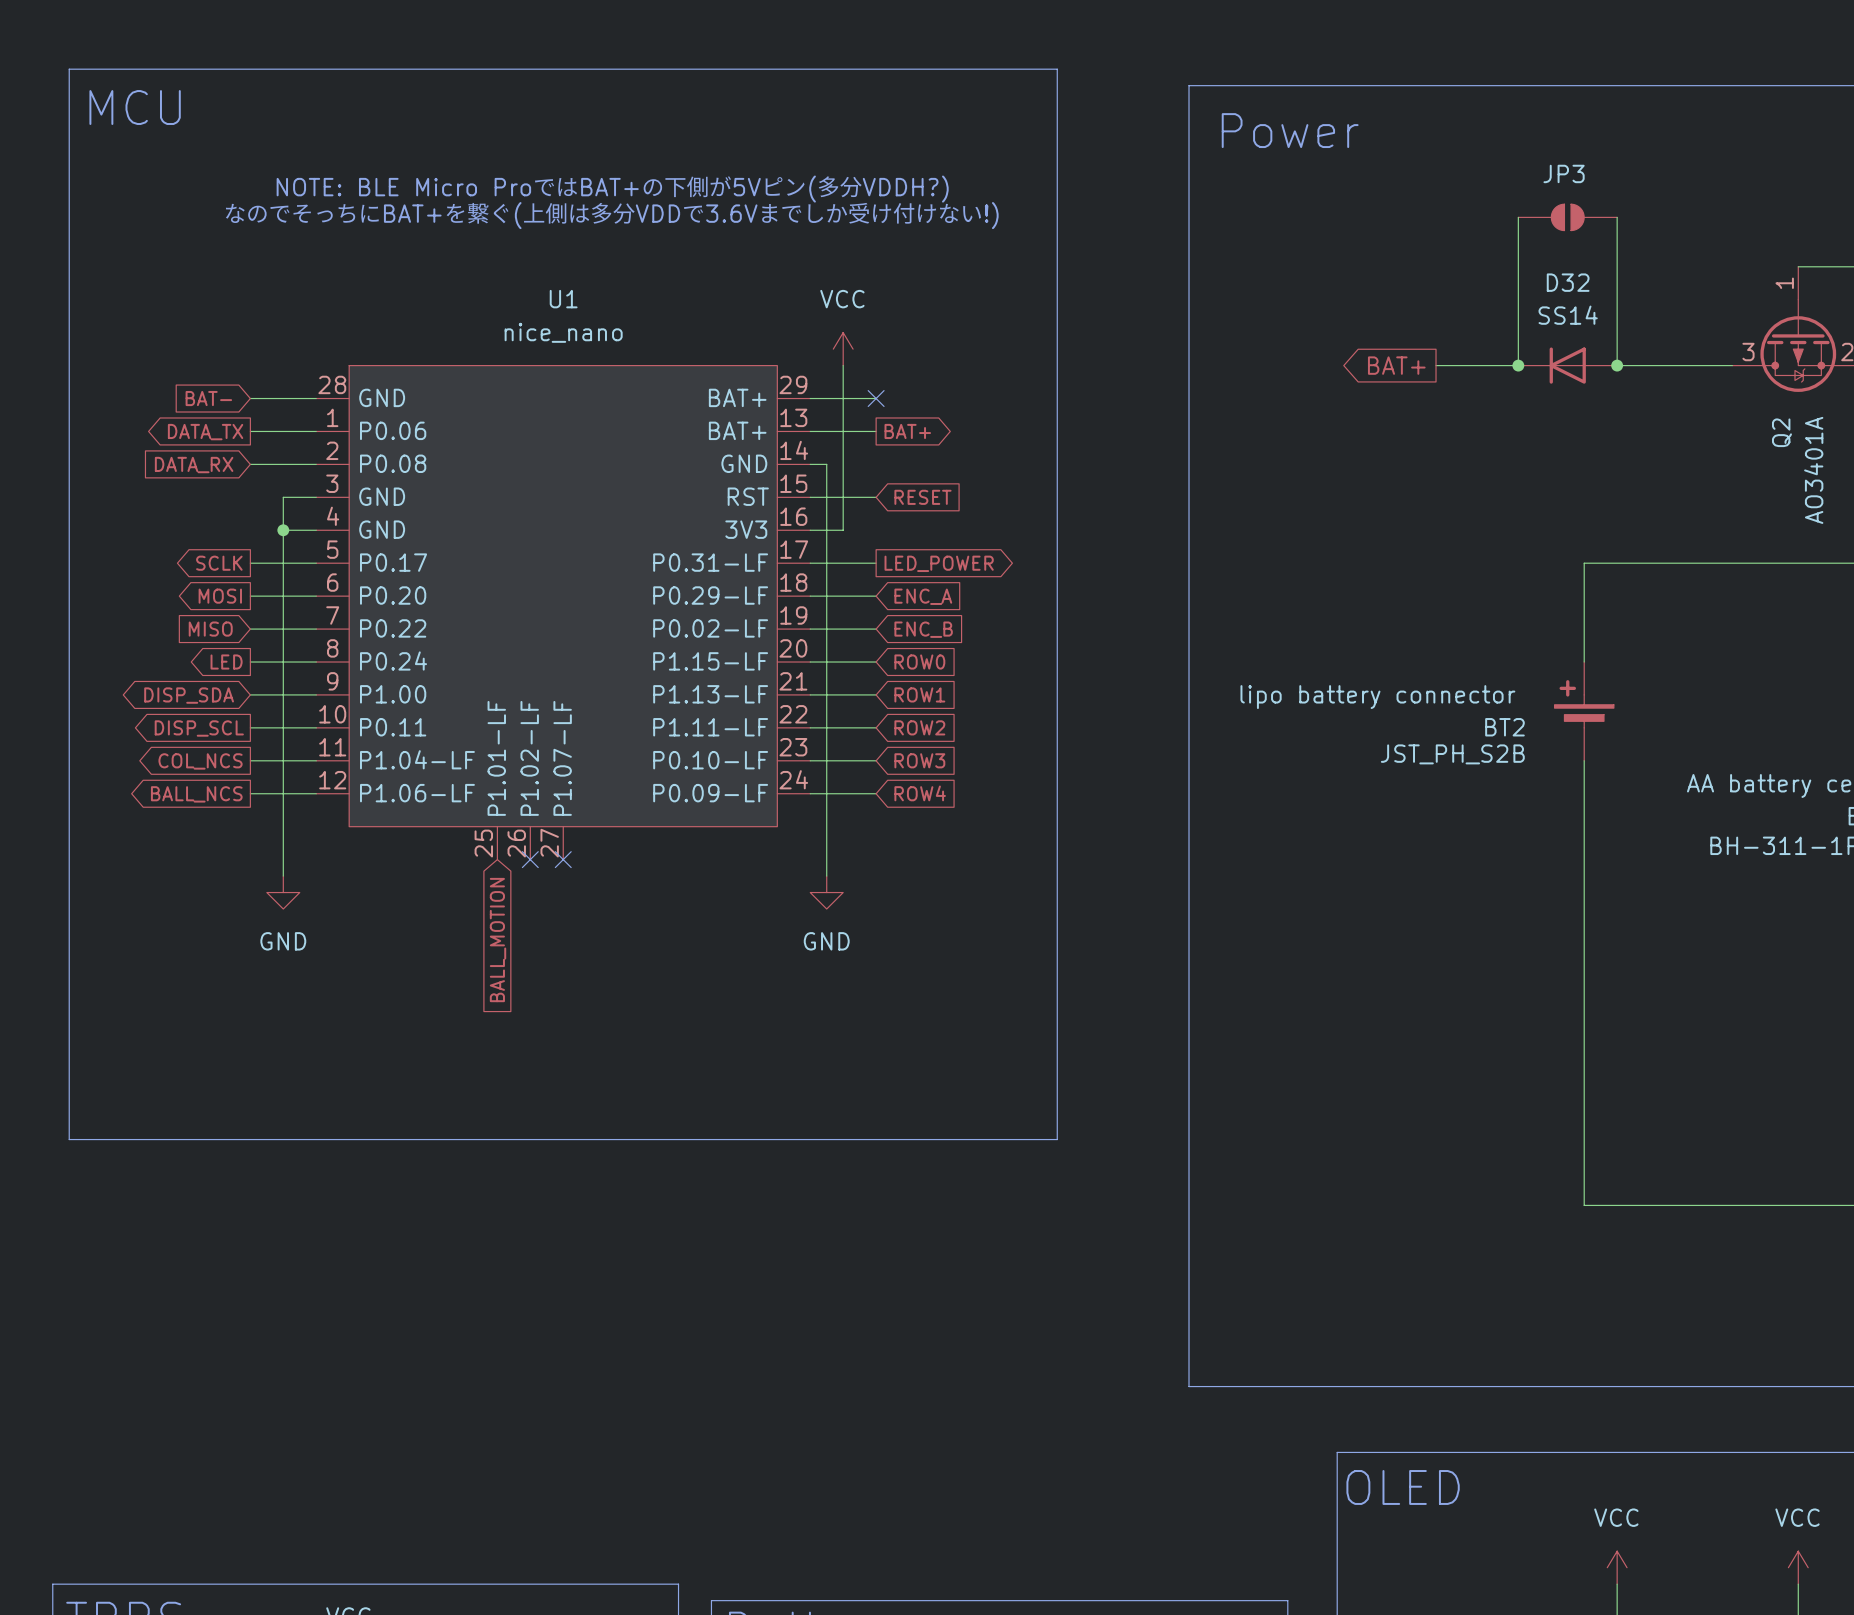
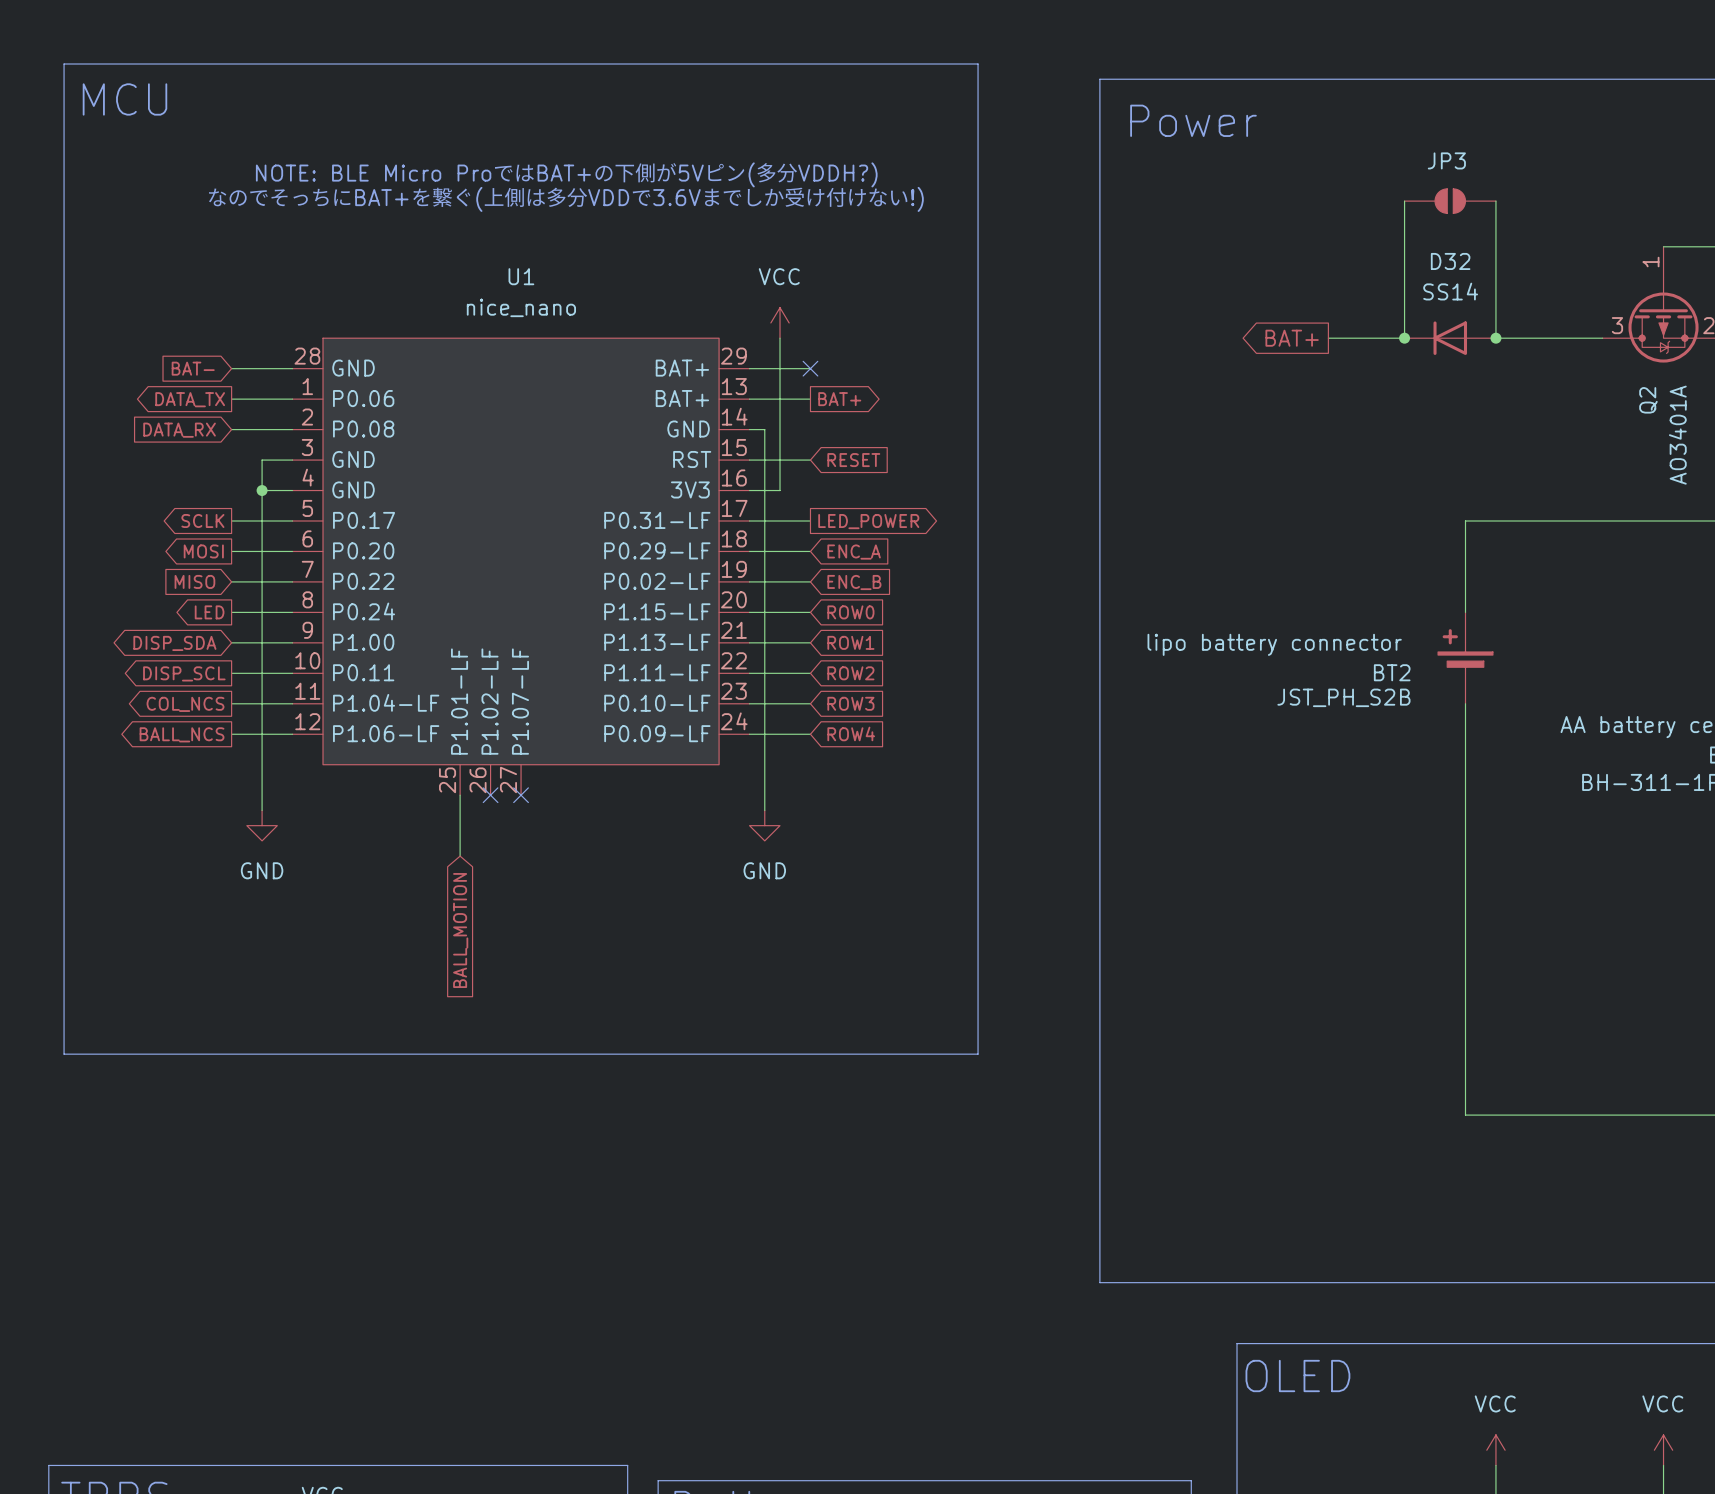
wire: none -> (460, 795) (460, 856)
global label position: BALL_MOTION (498, 940) -> BALL_MOTION (460, 930)

